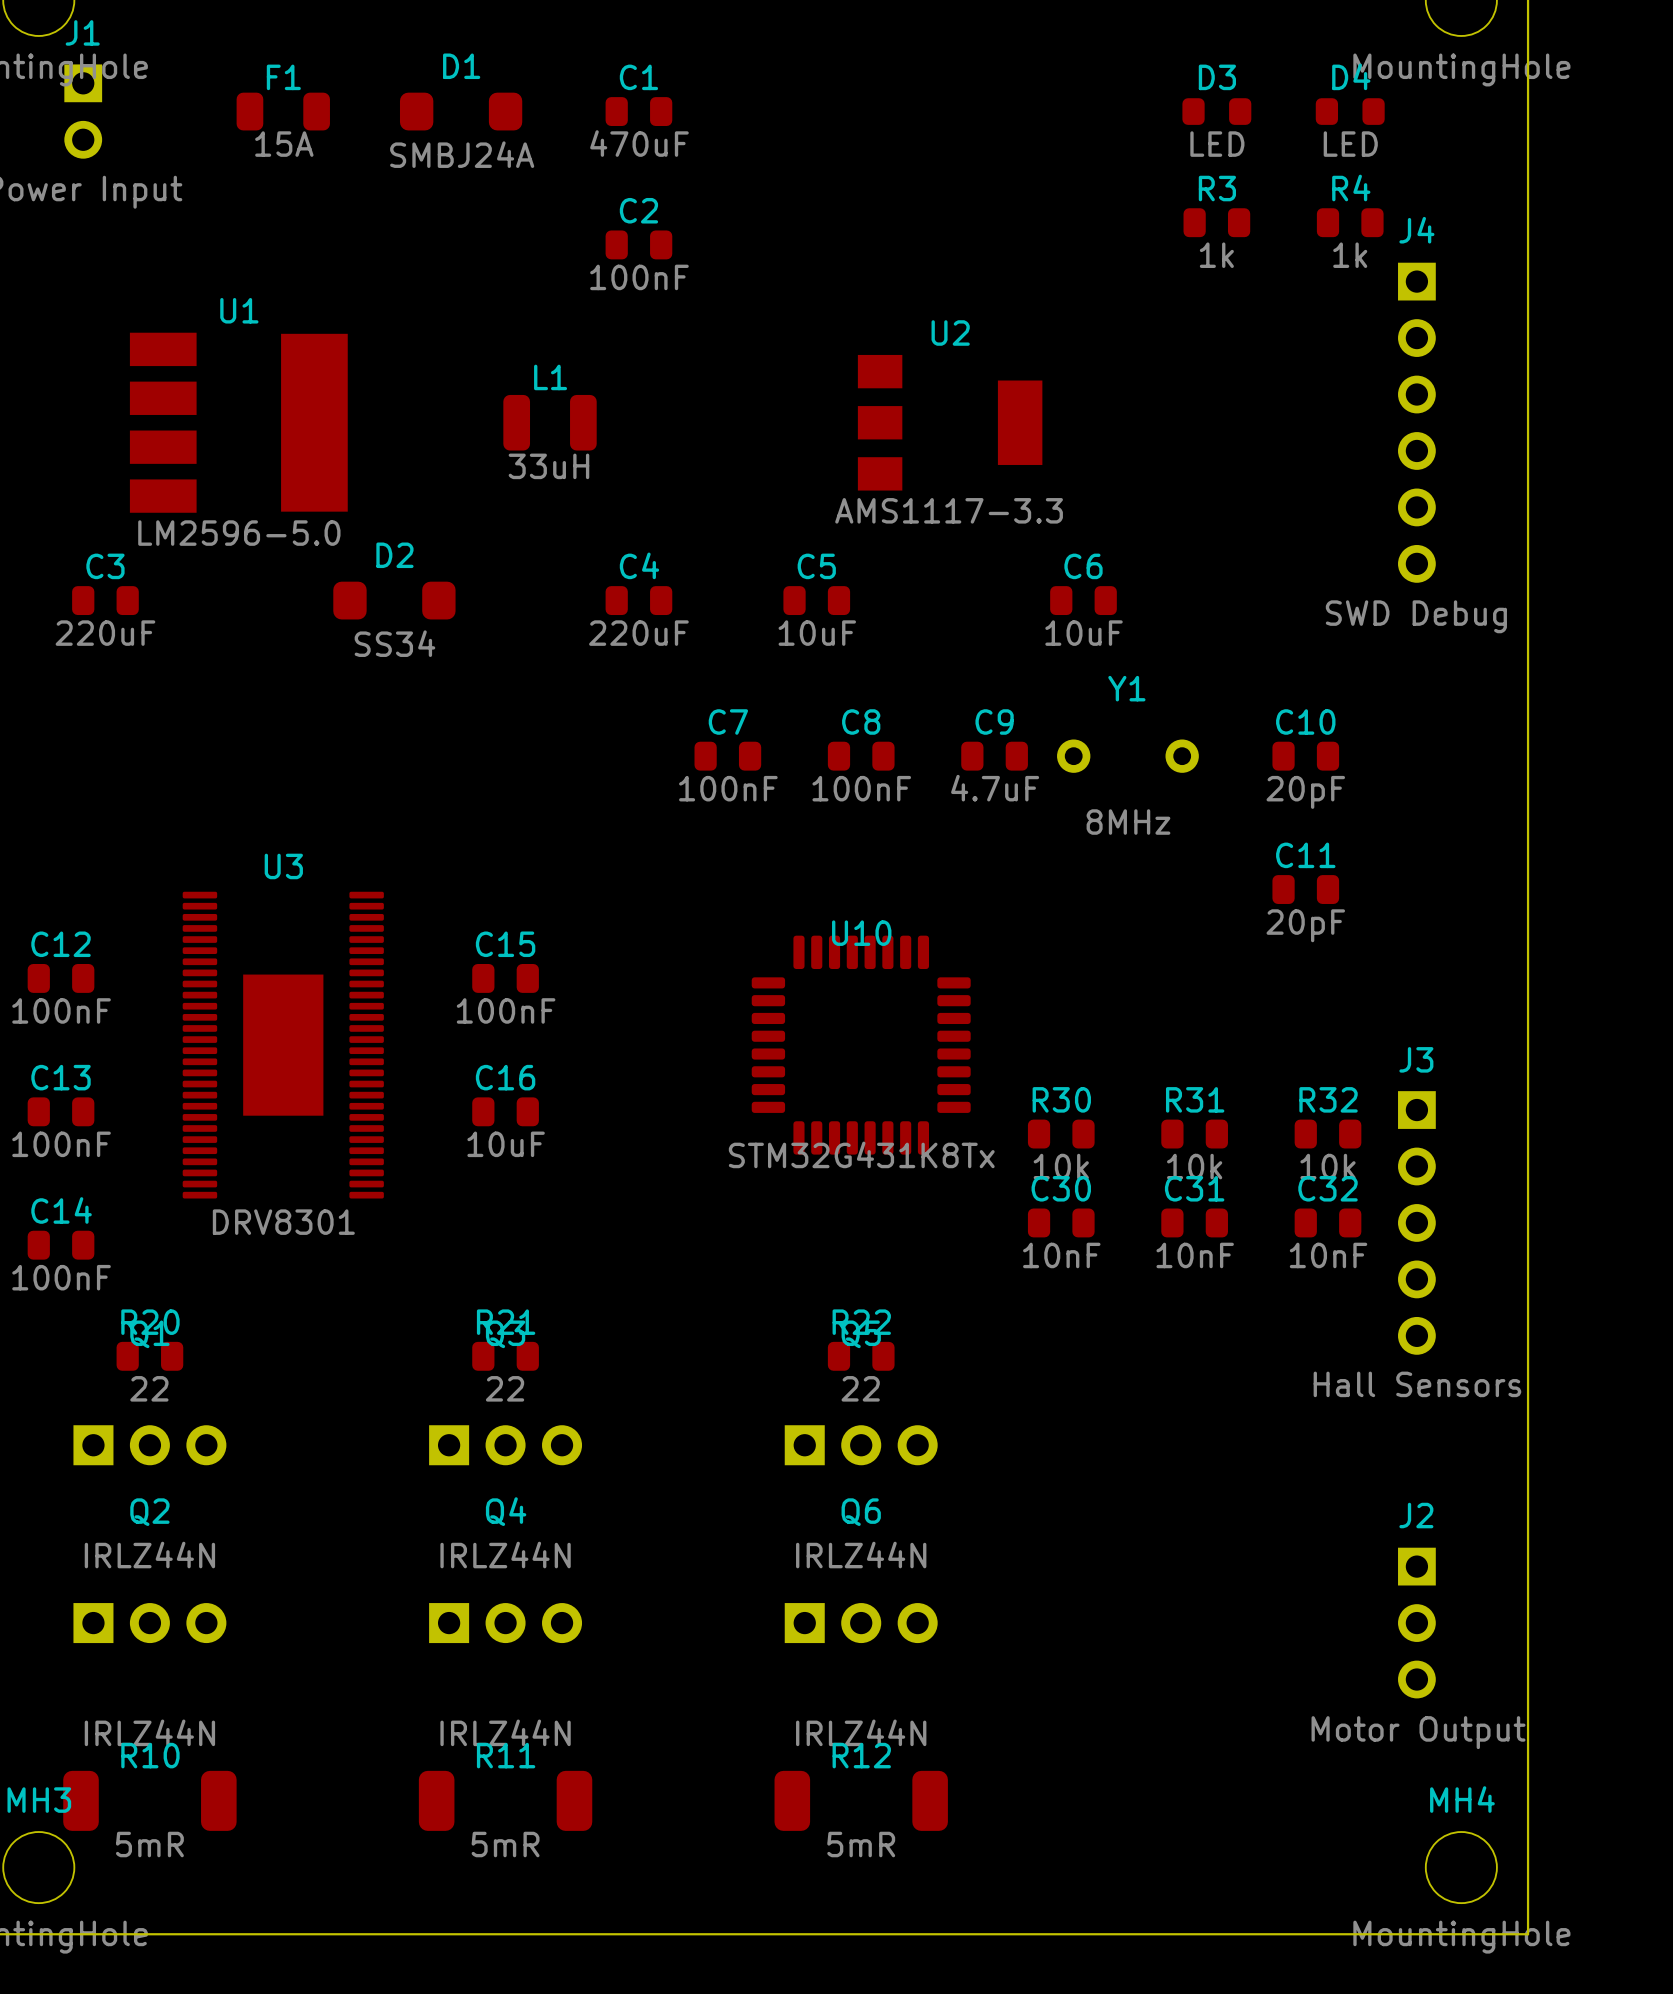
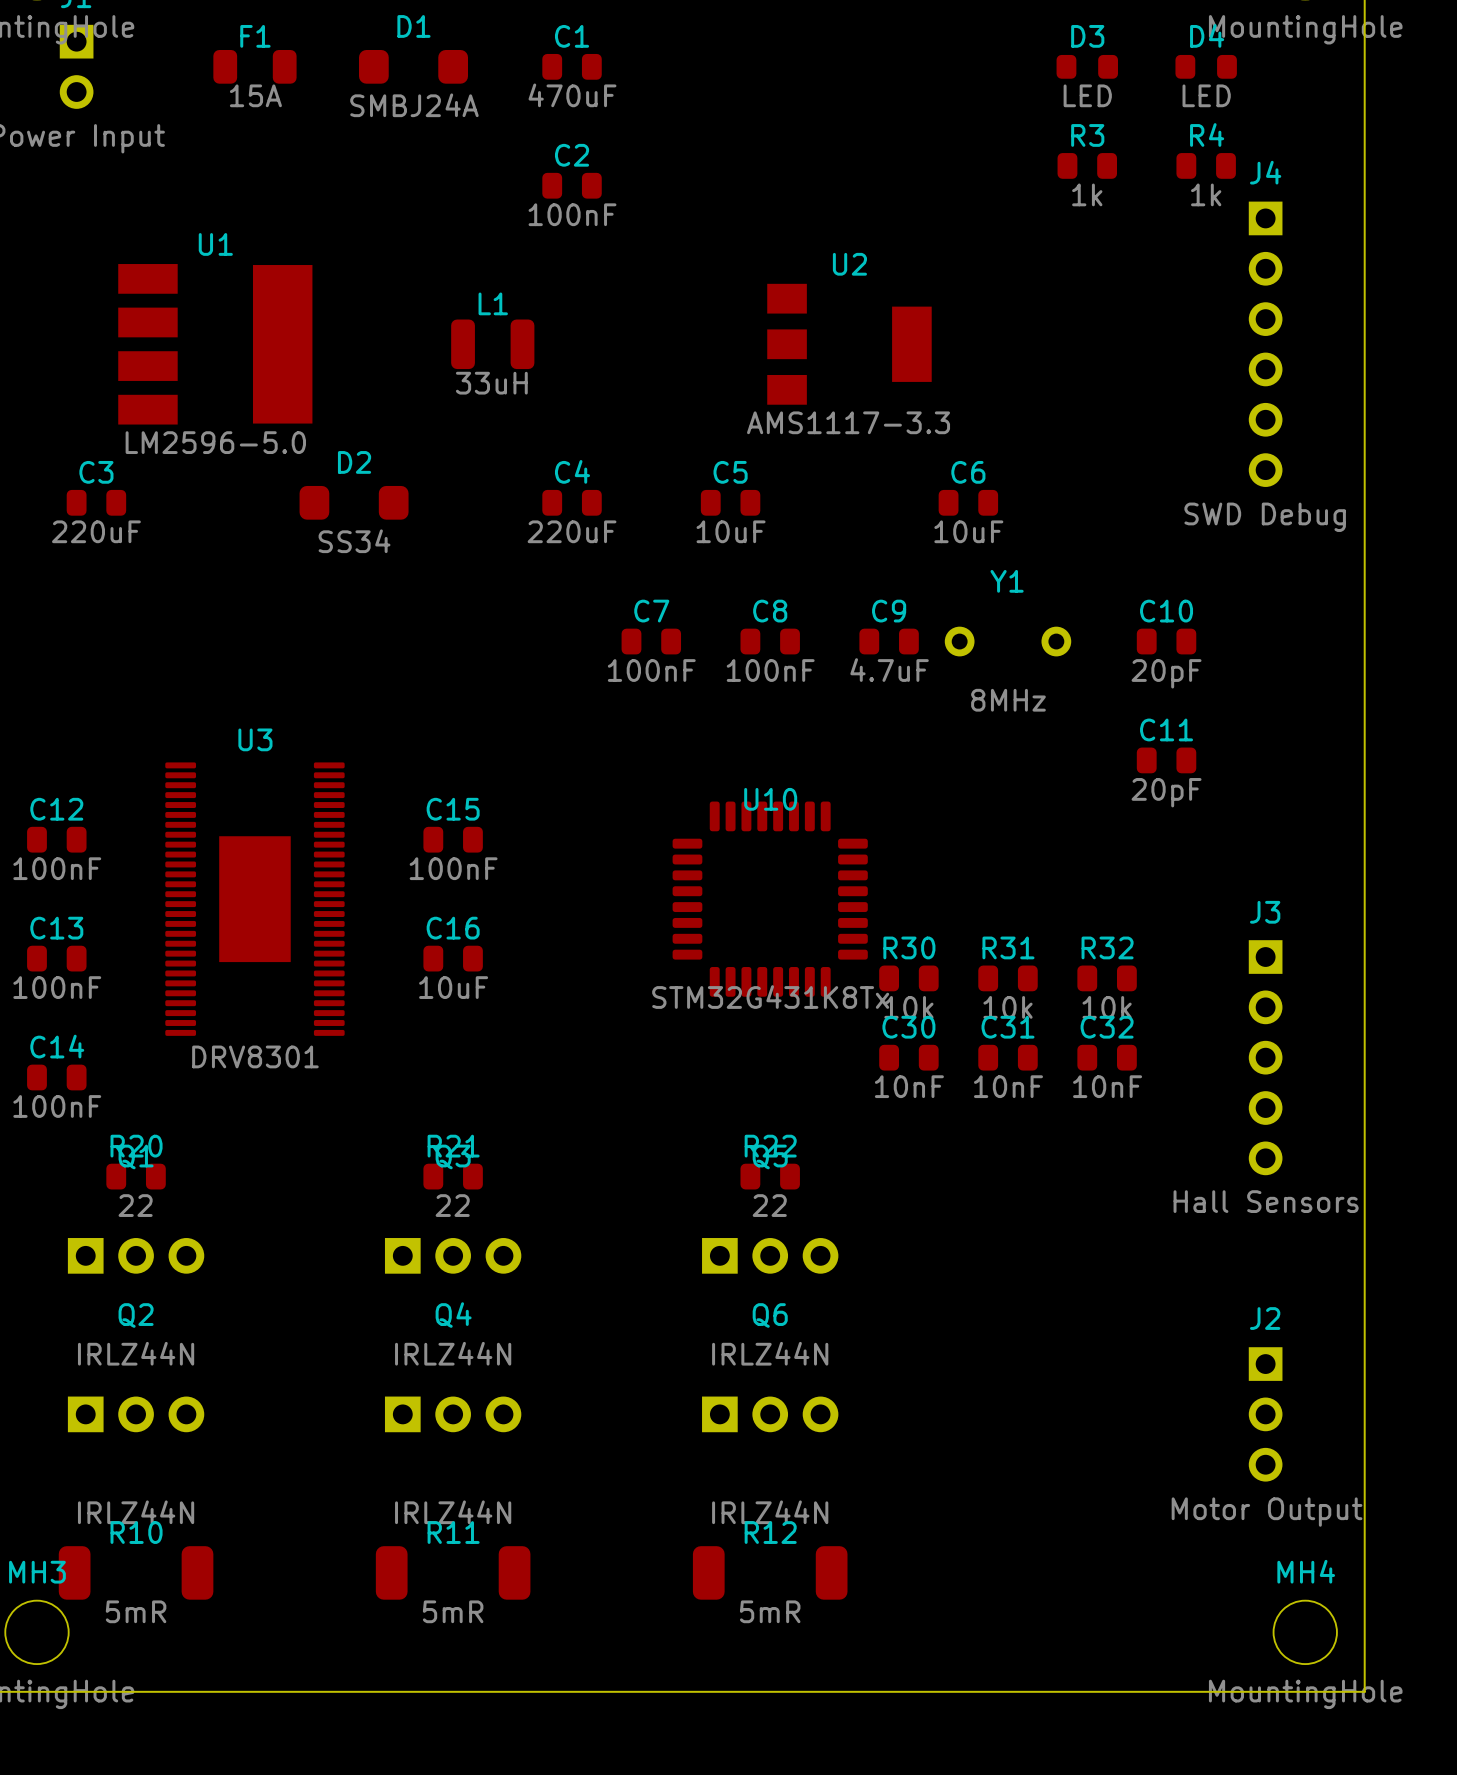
R30 position: (1061, 1134) -> (908, 978)
R31 position: (1194, 1134) -> (1008, 978)
R32 position: (1328, 1134) -> (1107, 978)
C30 position: (1061, 1222) -> (908, 1057)
C31 position: (1194, 1222) -> (1008, 1057)
C32 position: (1328, 1222) -> (1107, 1057)

